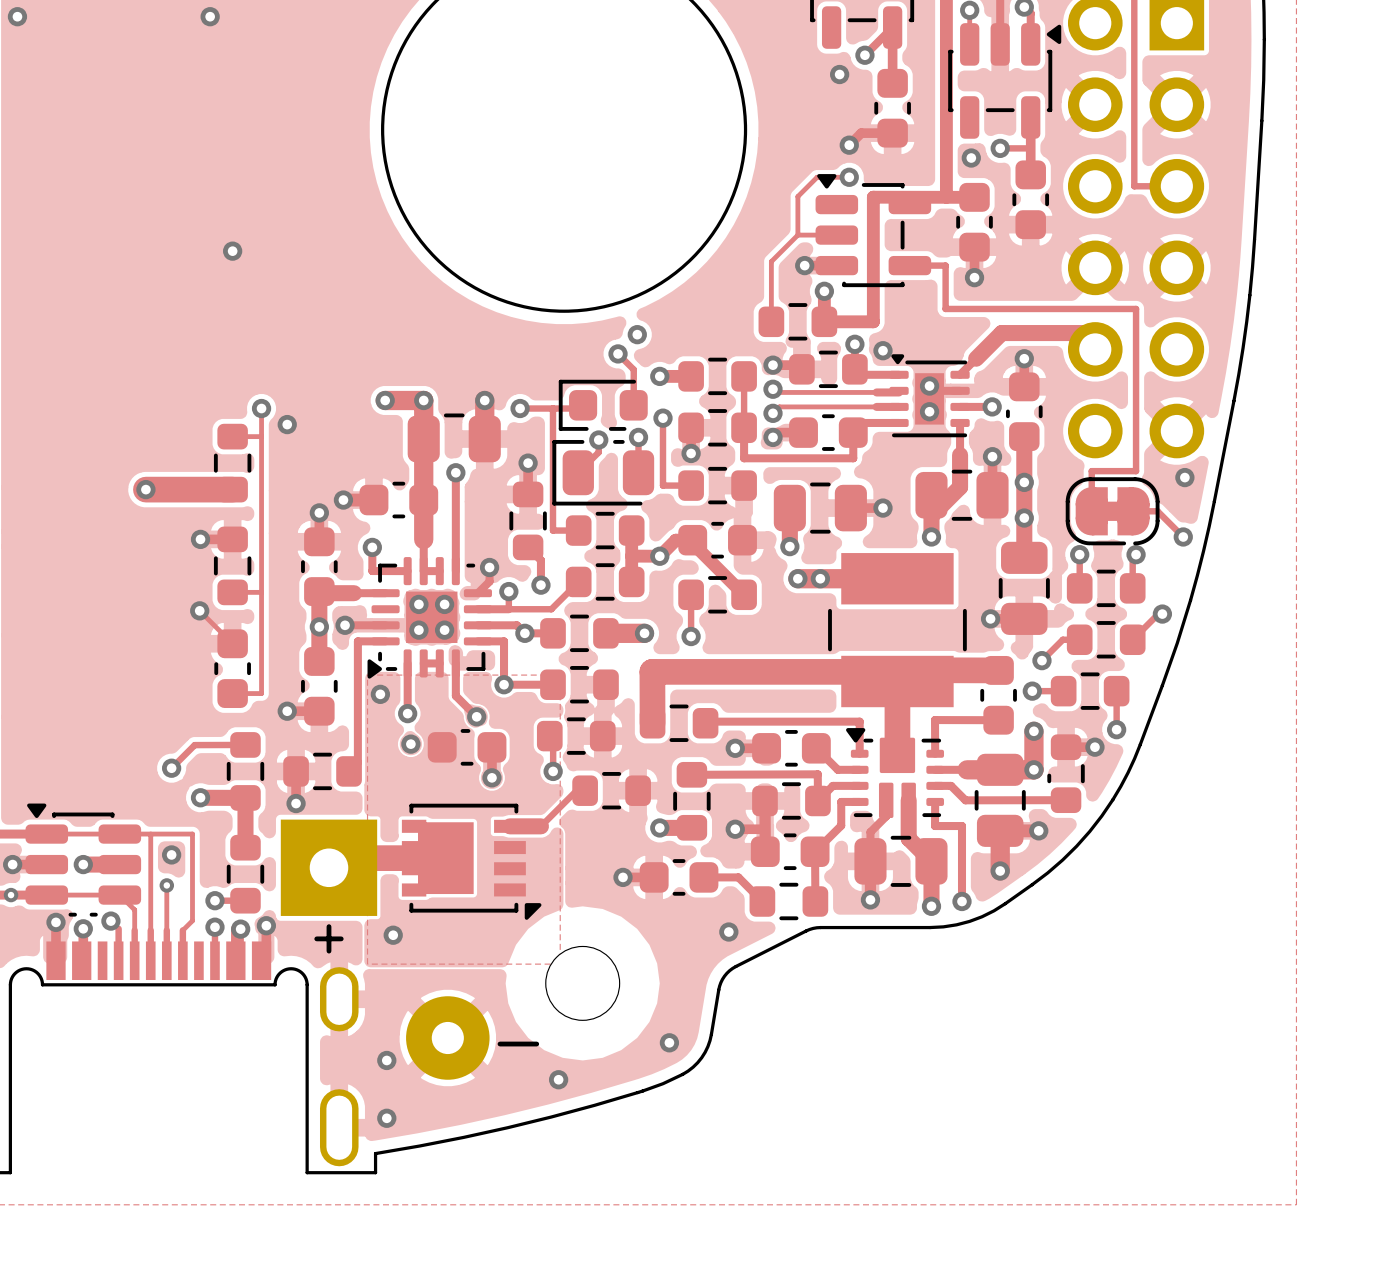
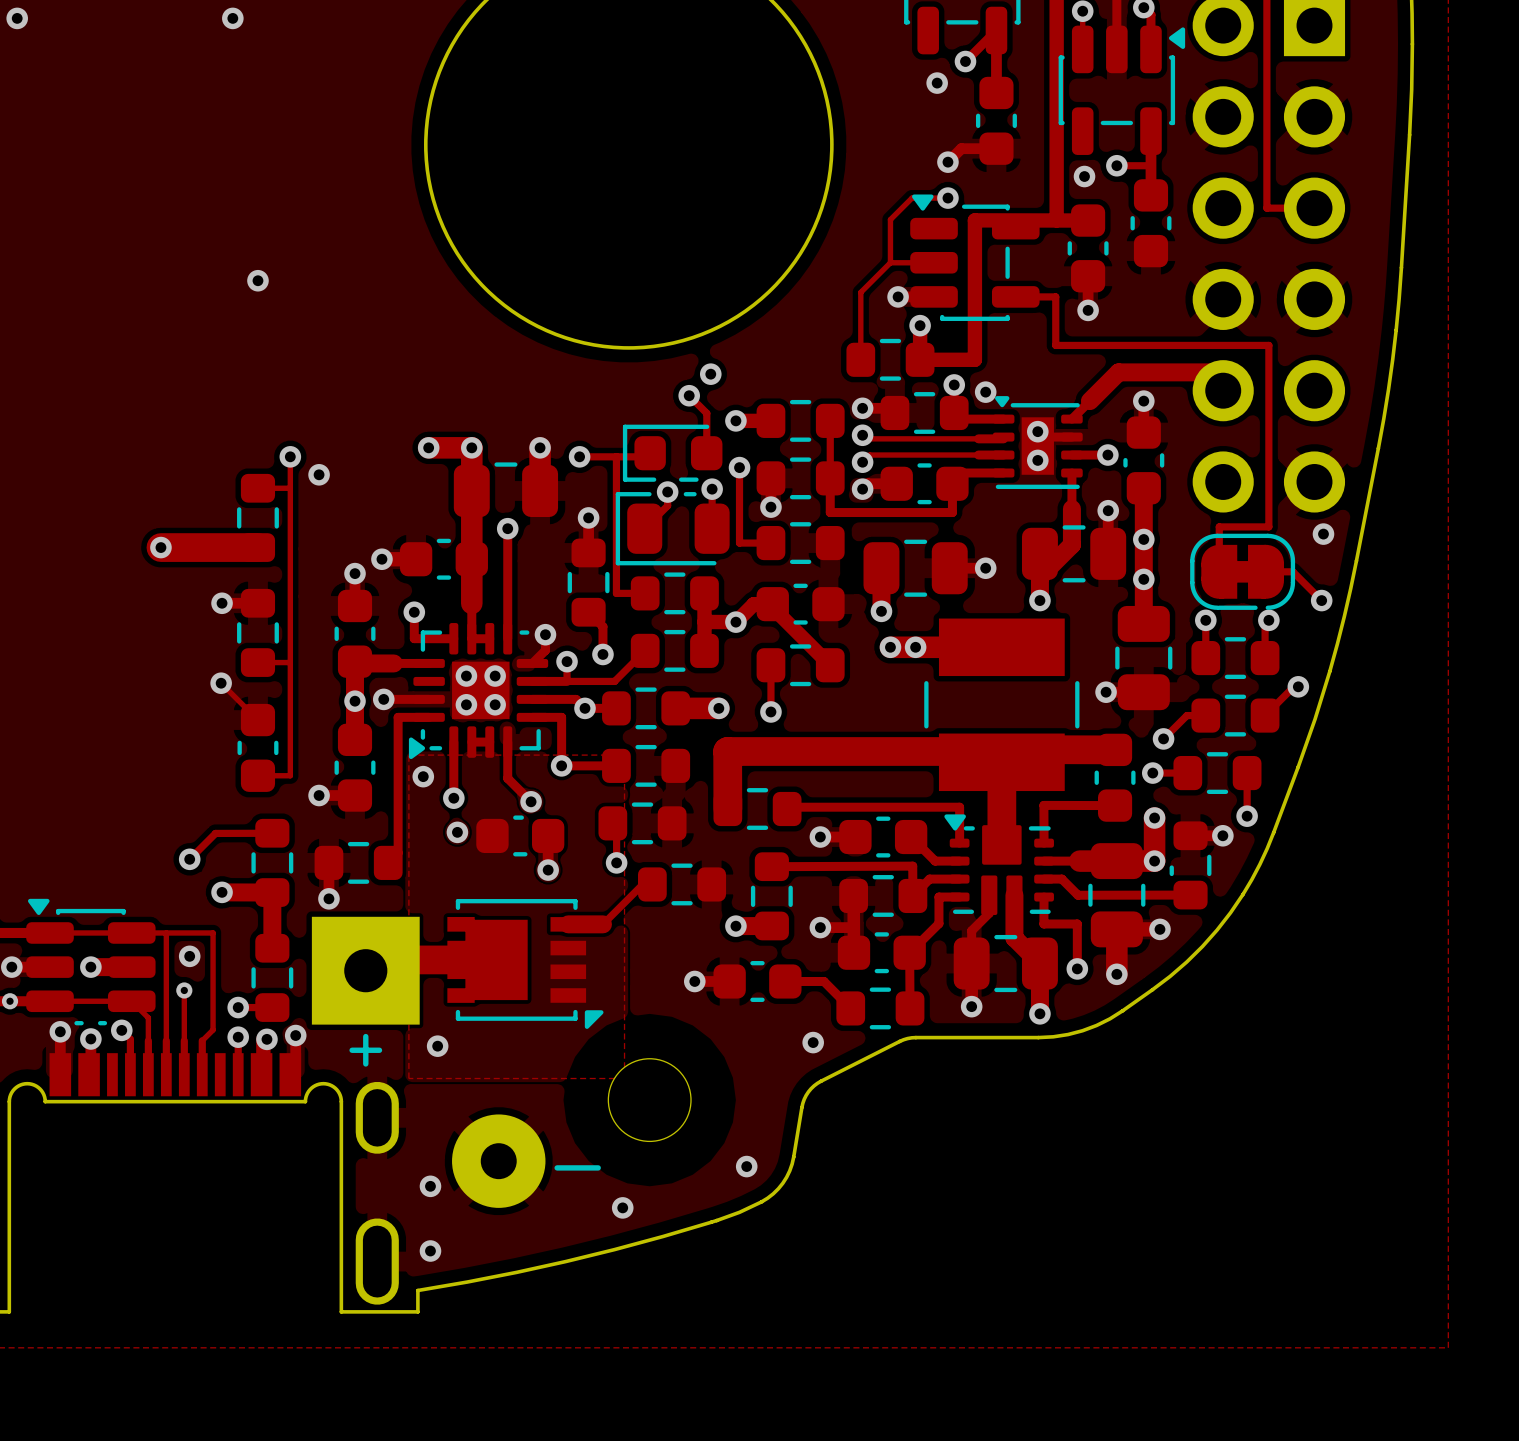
track: (961, 826) (961, 901) -> (1074, 923) (1077, 923) (1077, 968)
via position: (961, 901) -> (1077, 968)

